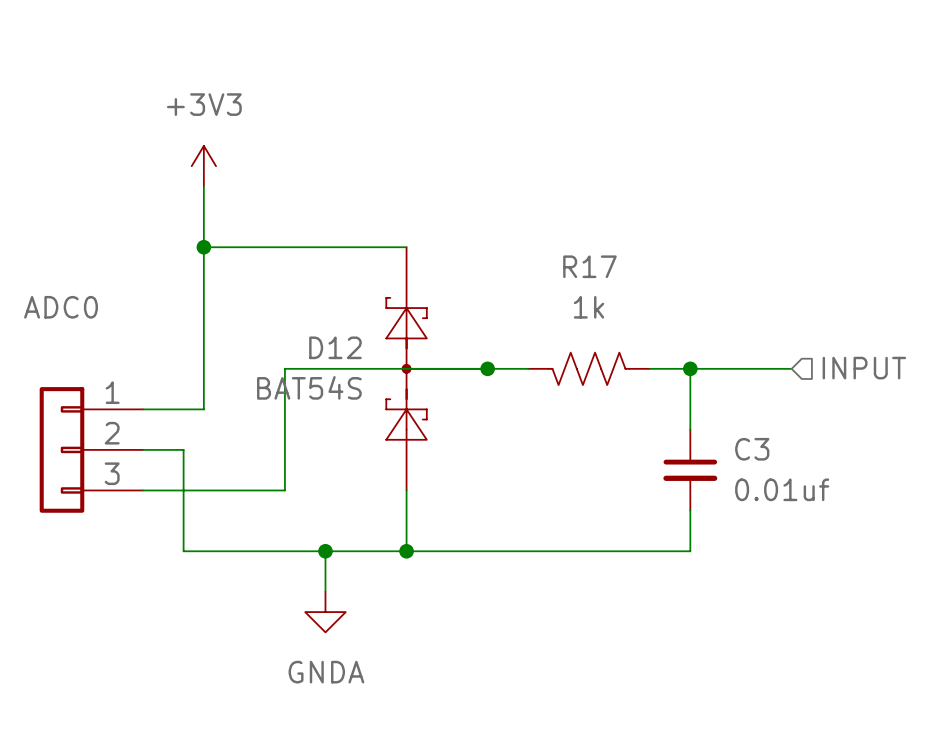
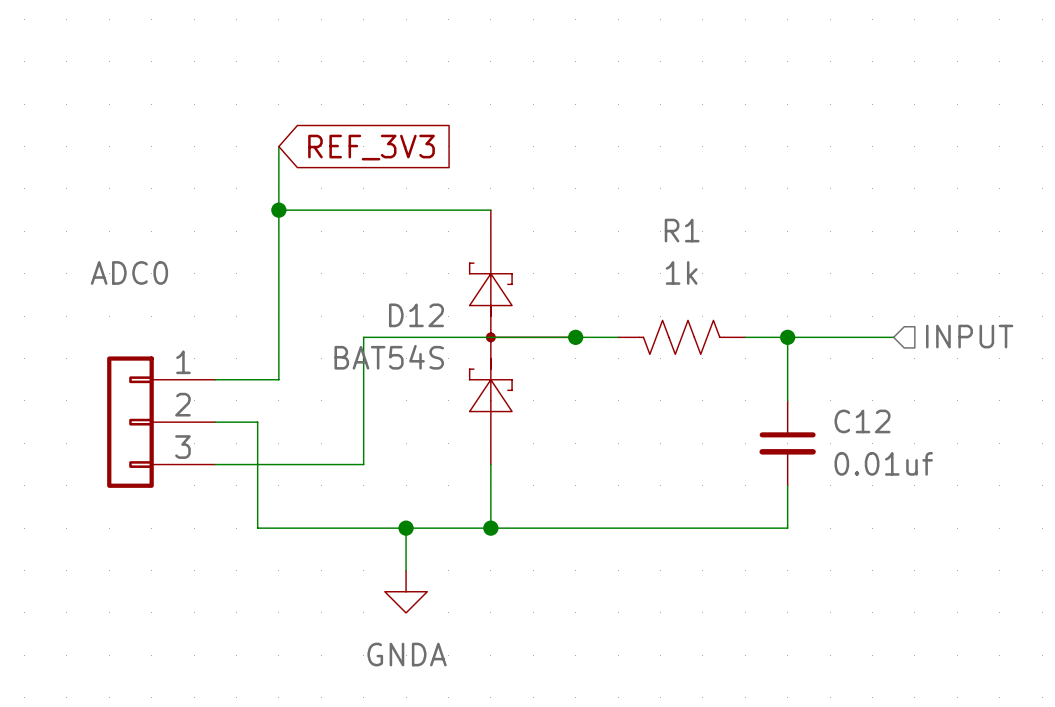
power symbol: +3V3 (203, 166) -> none
global label: none -> REF_3V3 (371, 147)
R17 name: R17 (589, 266) -> R1 (682, 230)
C3 name: C3 (752, 449) -> C12 (862, 421)

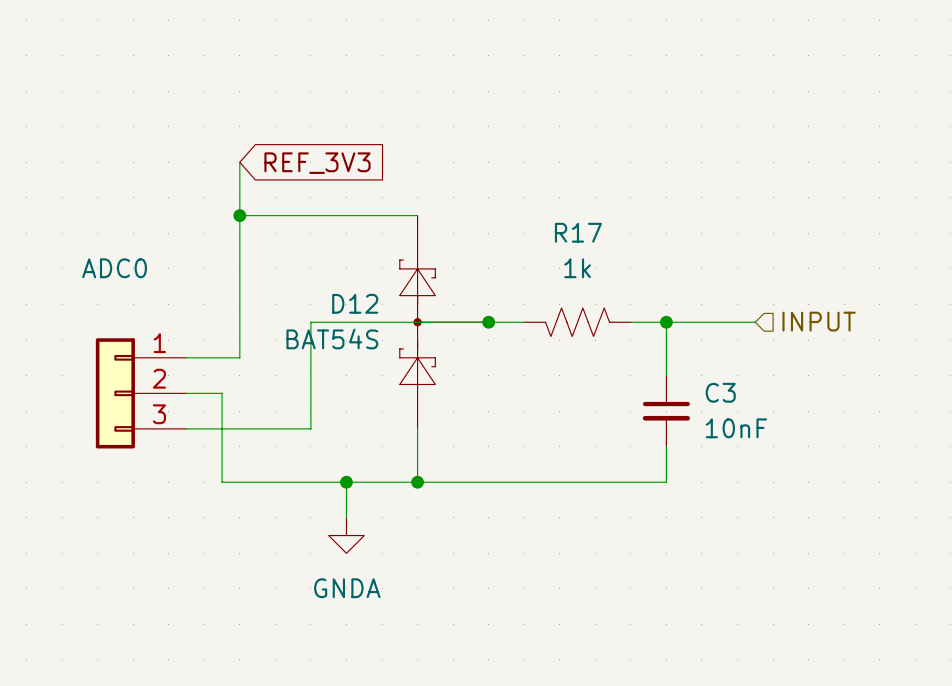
R1 name: R1 (682, 230) -> R17 (578, 232)
C12 name: C12 (862, 421) -> C3 (720, 392)
C12 value: 0.01uf (883, 463) -> 10nF (736, 428)

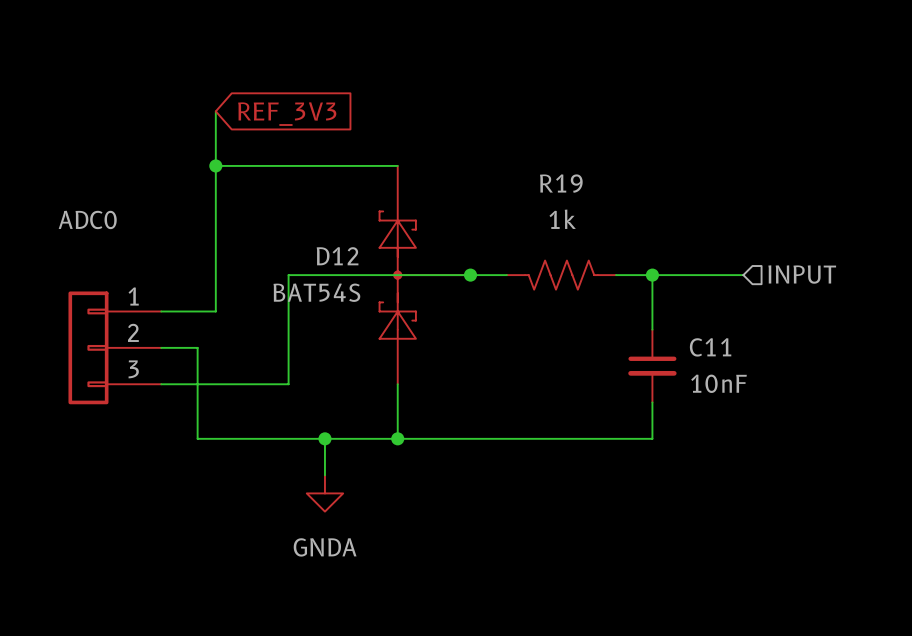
R17 name: R17 (578, 232) -> R19 (561, 183)
C3 name: C3 (720, 392) -> C11 (710, 347)

